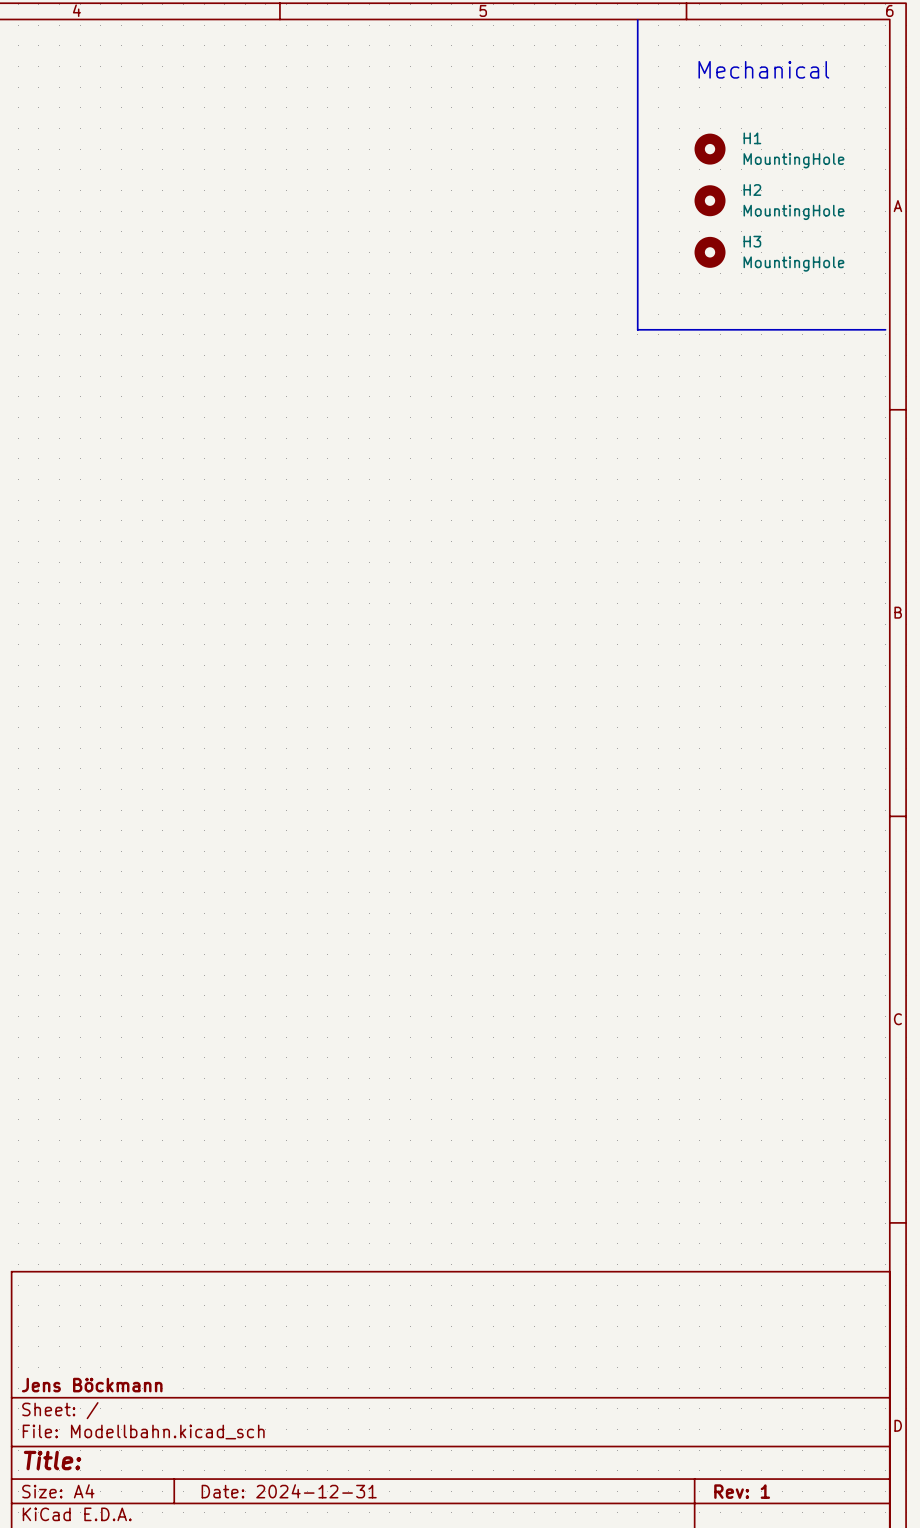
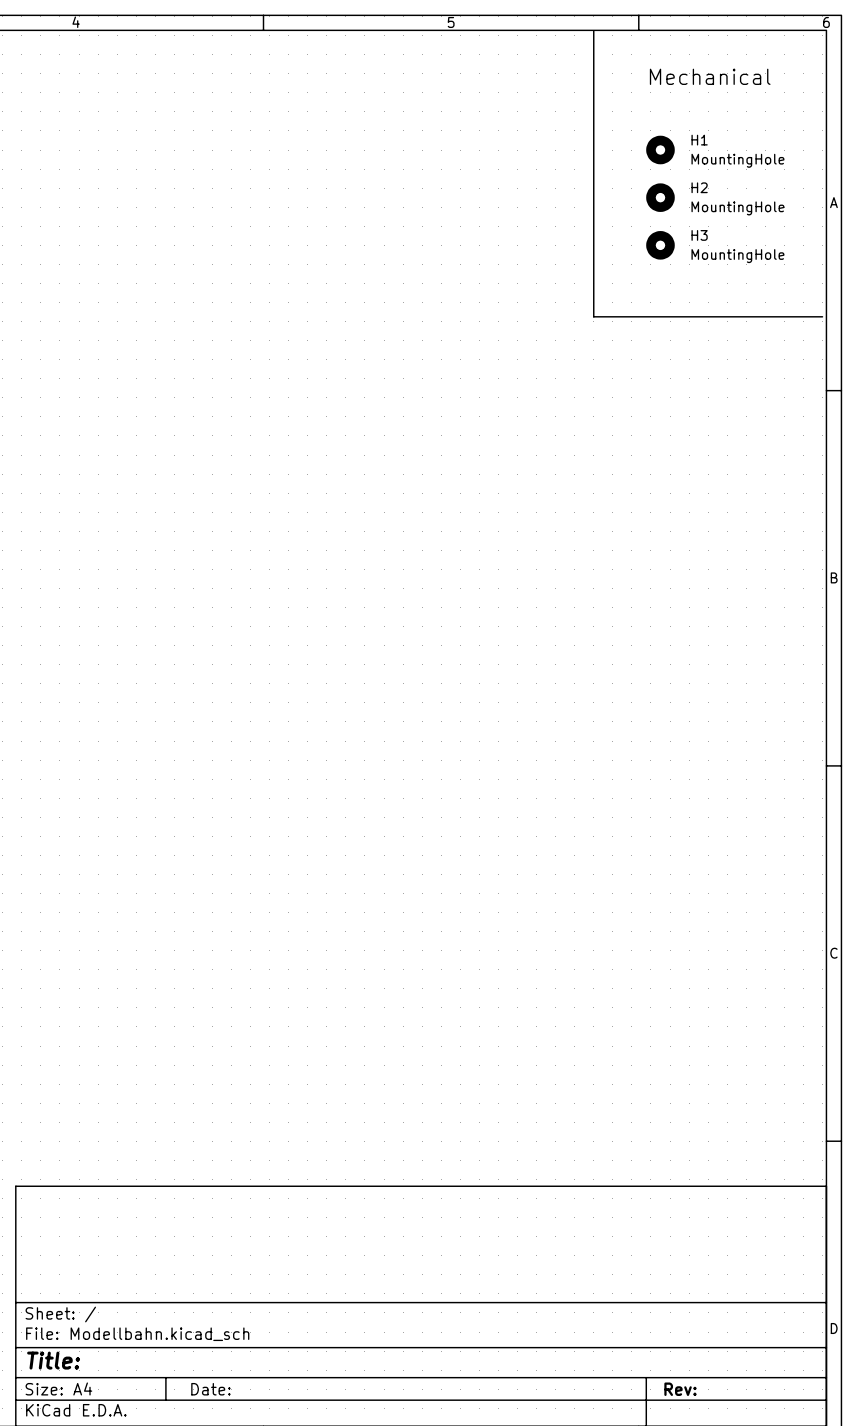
title block: Jens Böckmann (92, 1385) -> none
title block: Date: 2024-12-31 (289, 1491) -> Date: (210, 1389)
title block: Rev: 1 (742, 1491) -> Rev: (680, 1389)

